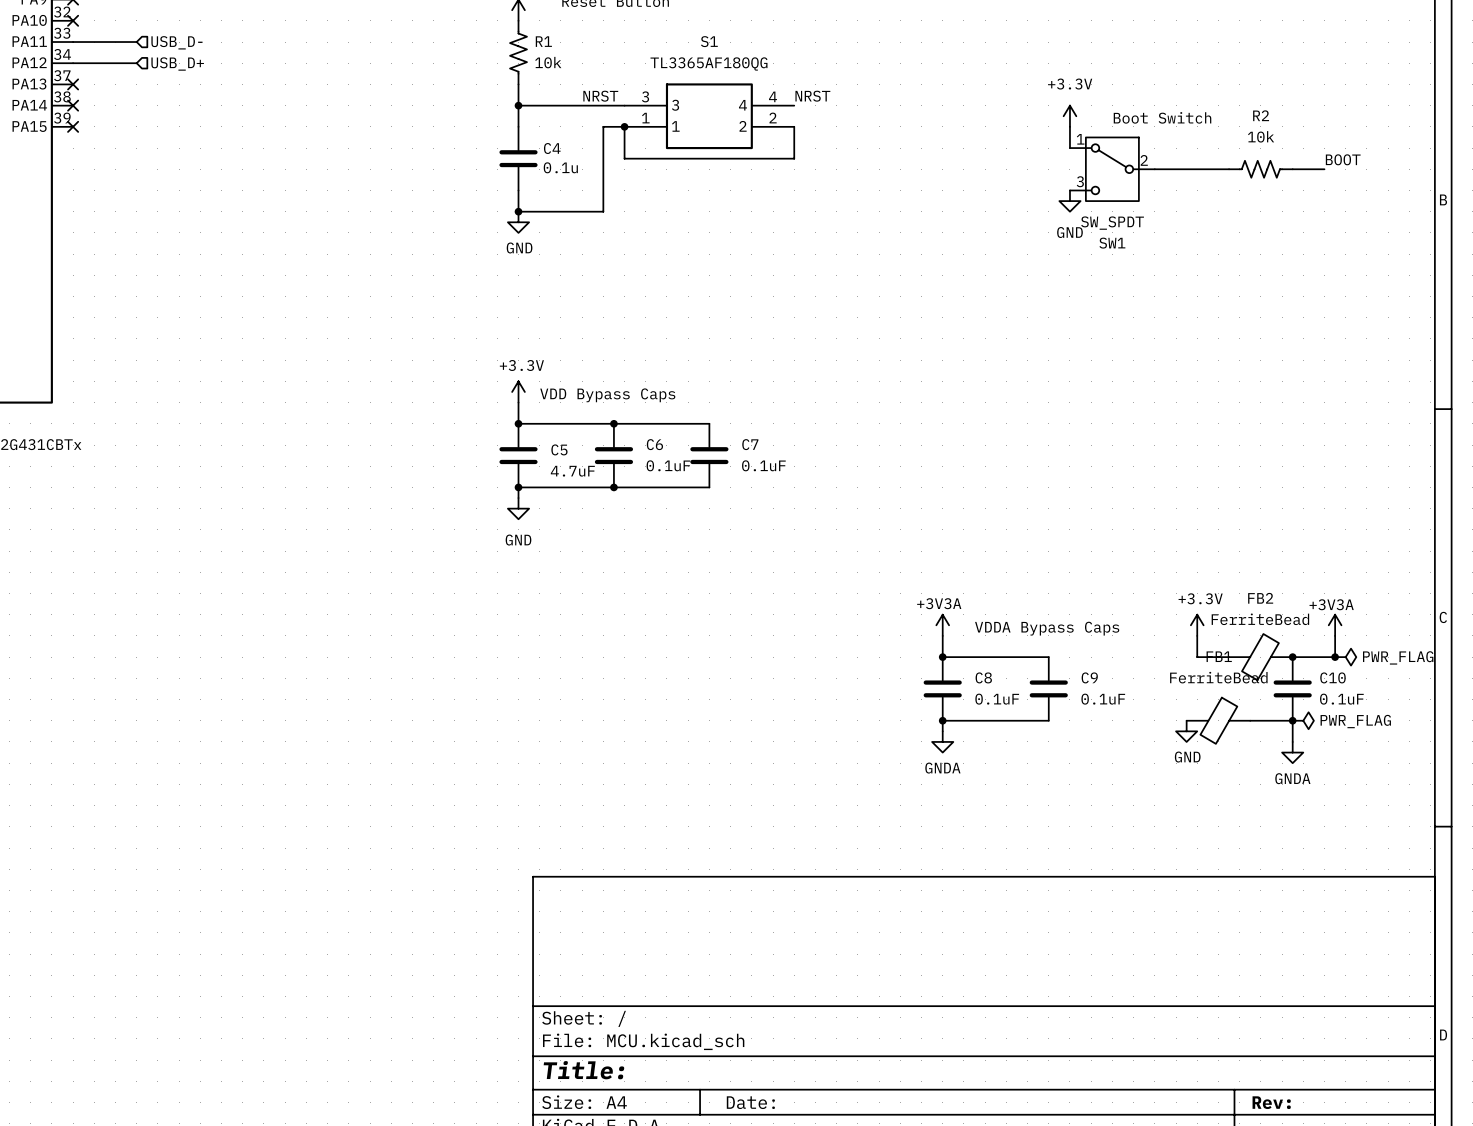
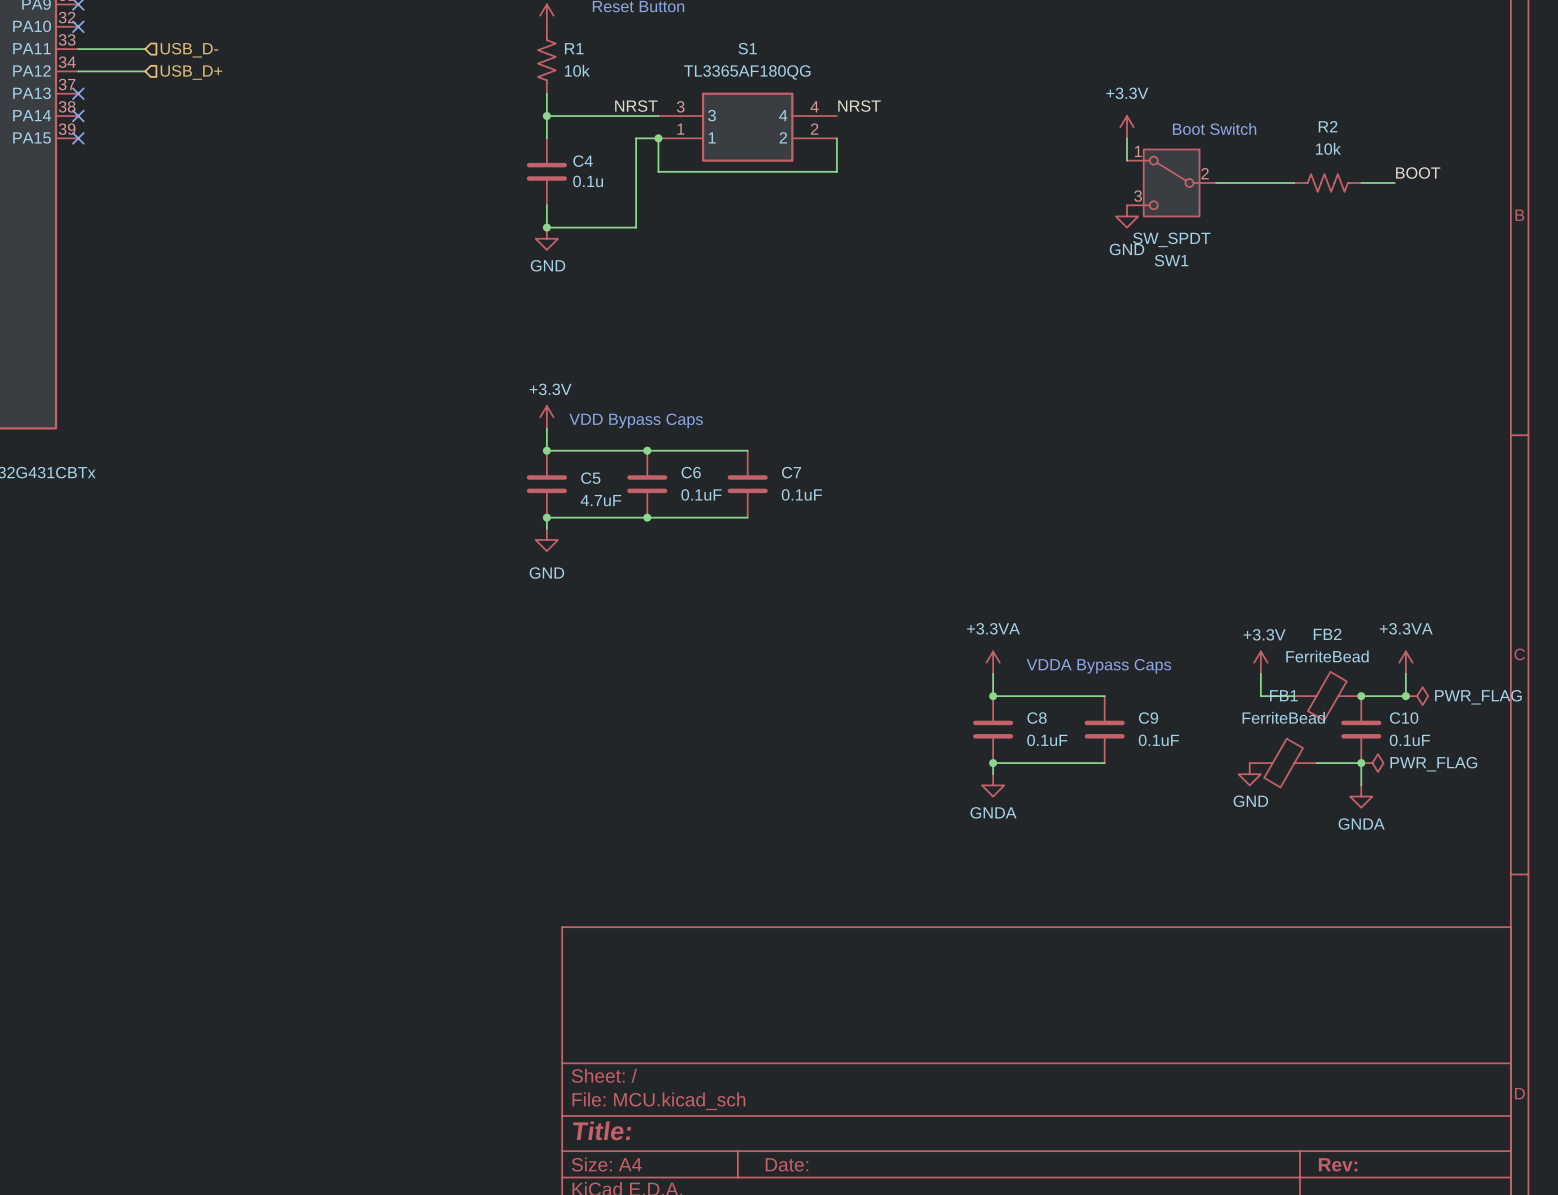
power symbol: +3V3A (942, 625) -> +3.3VA (993, 662)
power symbol: +3V3A (1335, 625) -> +3.3VA (1405, 662)

